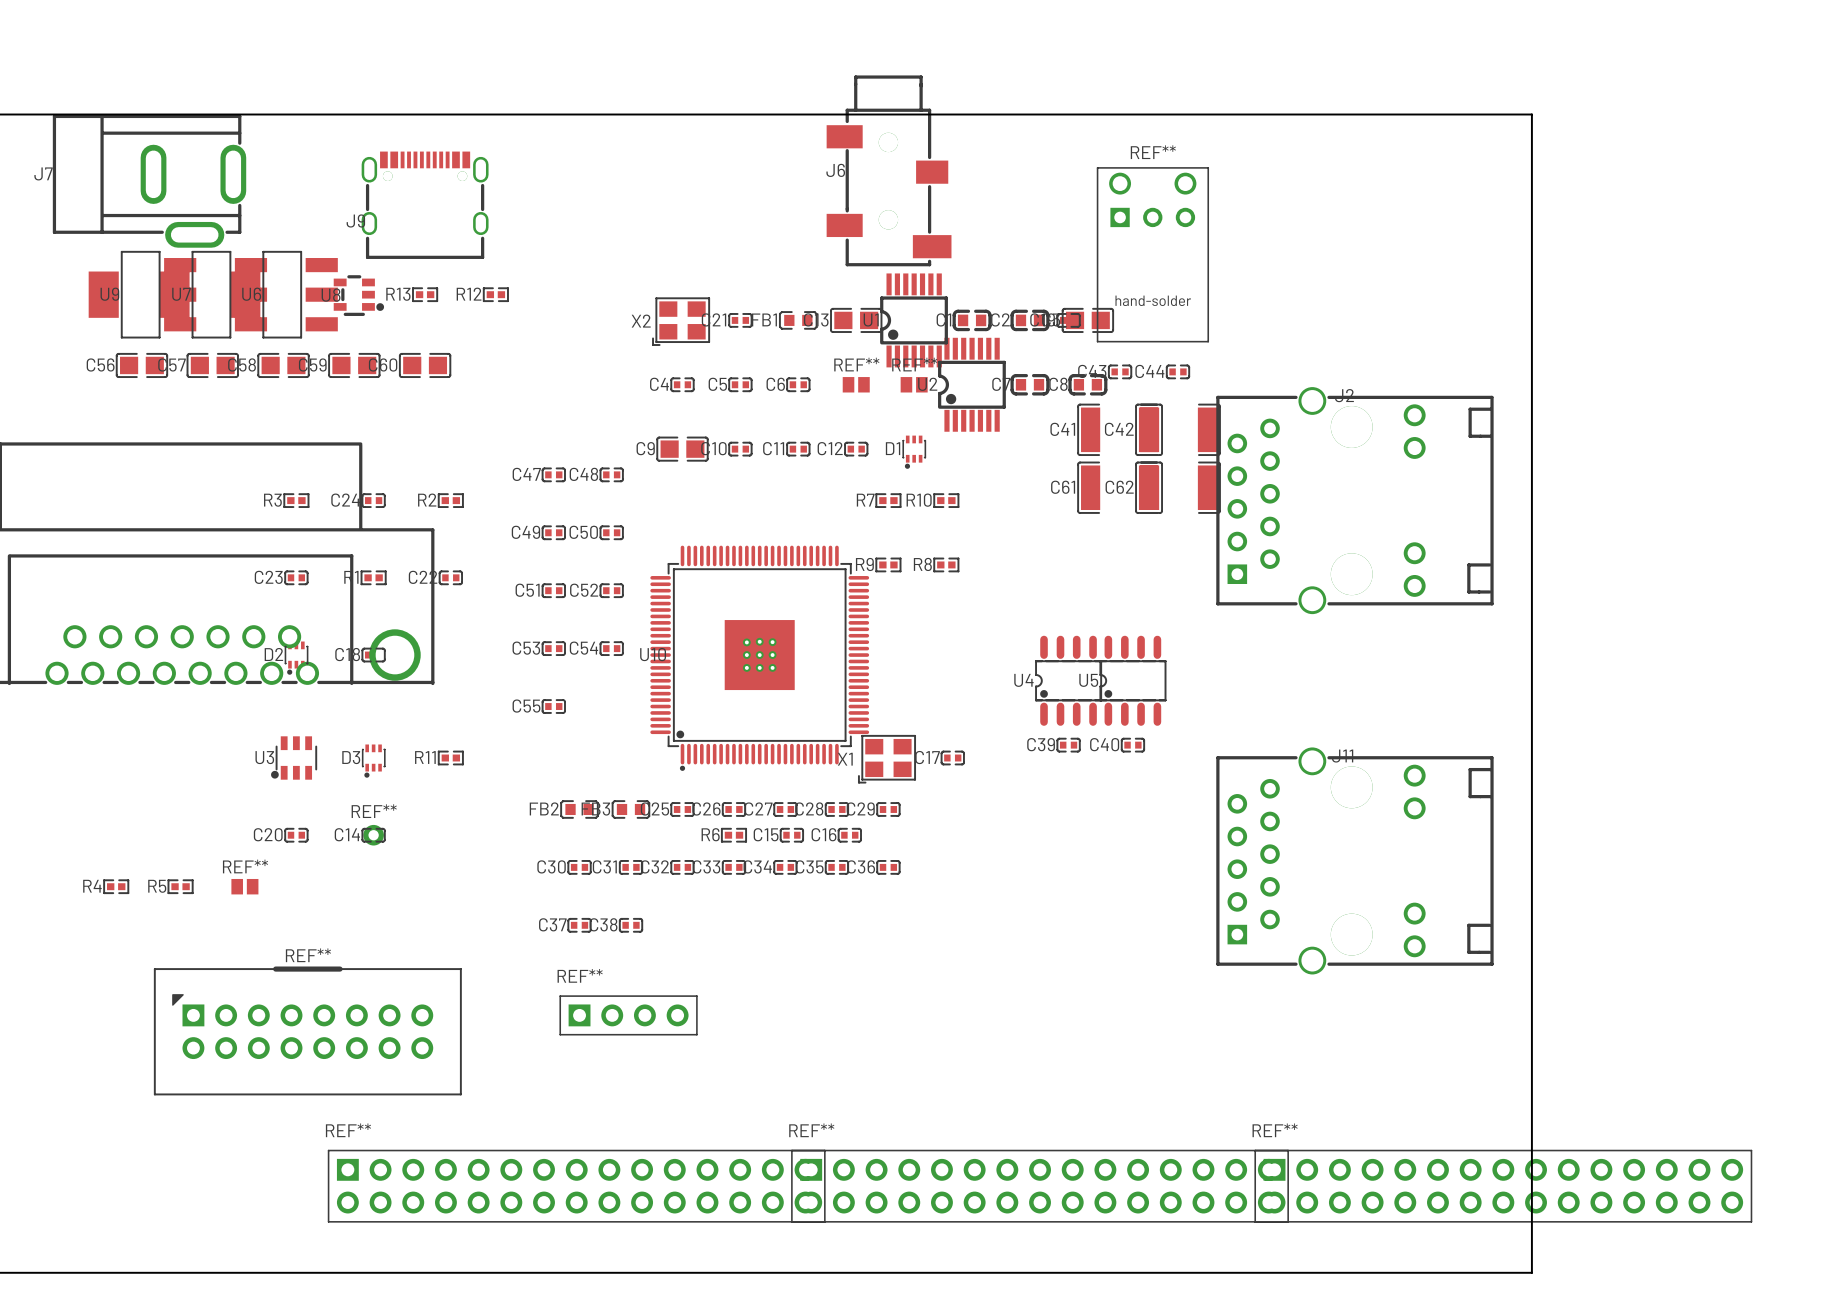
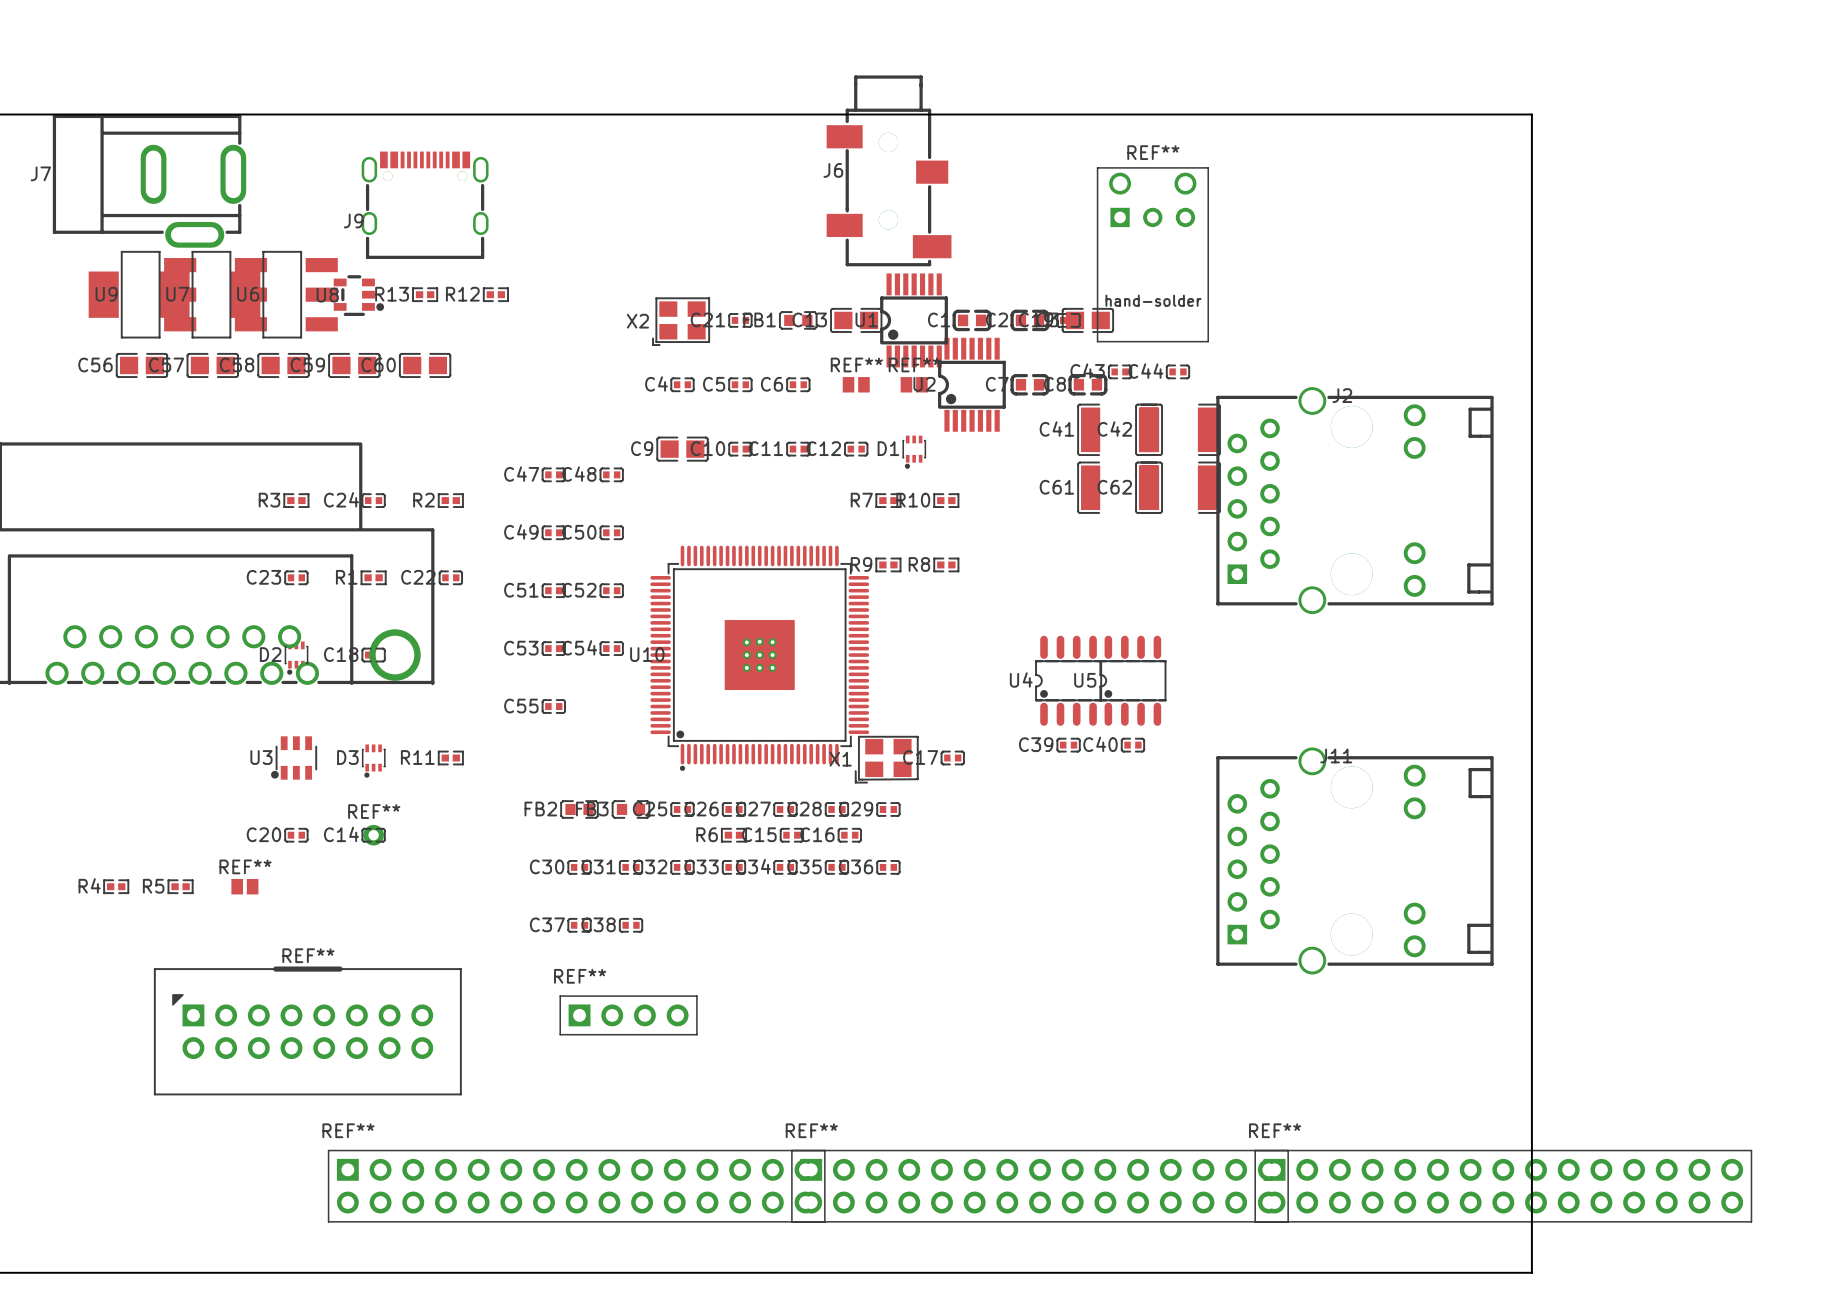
X1 footprint: [857, 734, 917, 784] -> [854, 735, 919, 784]

